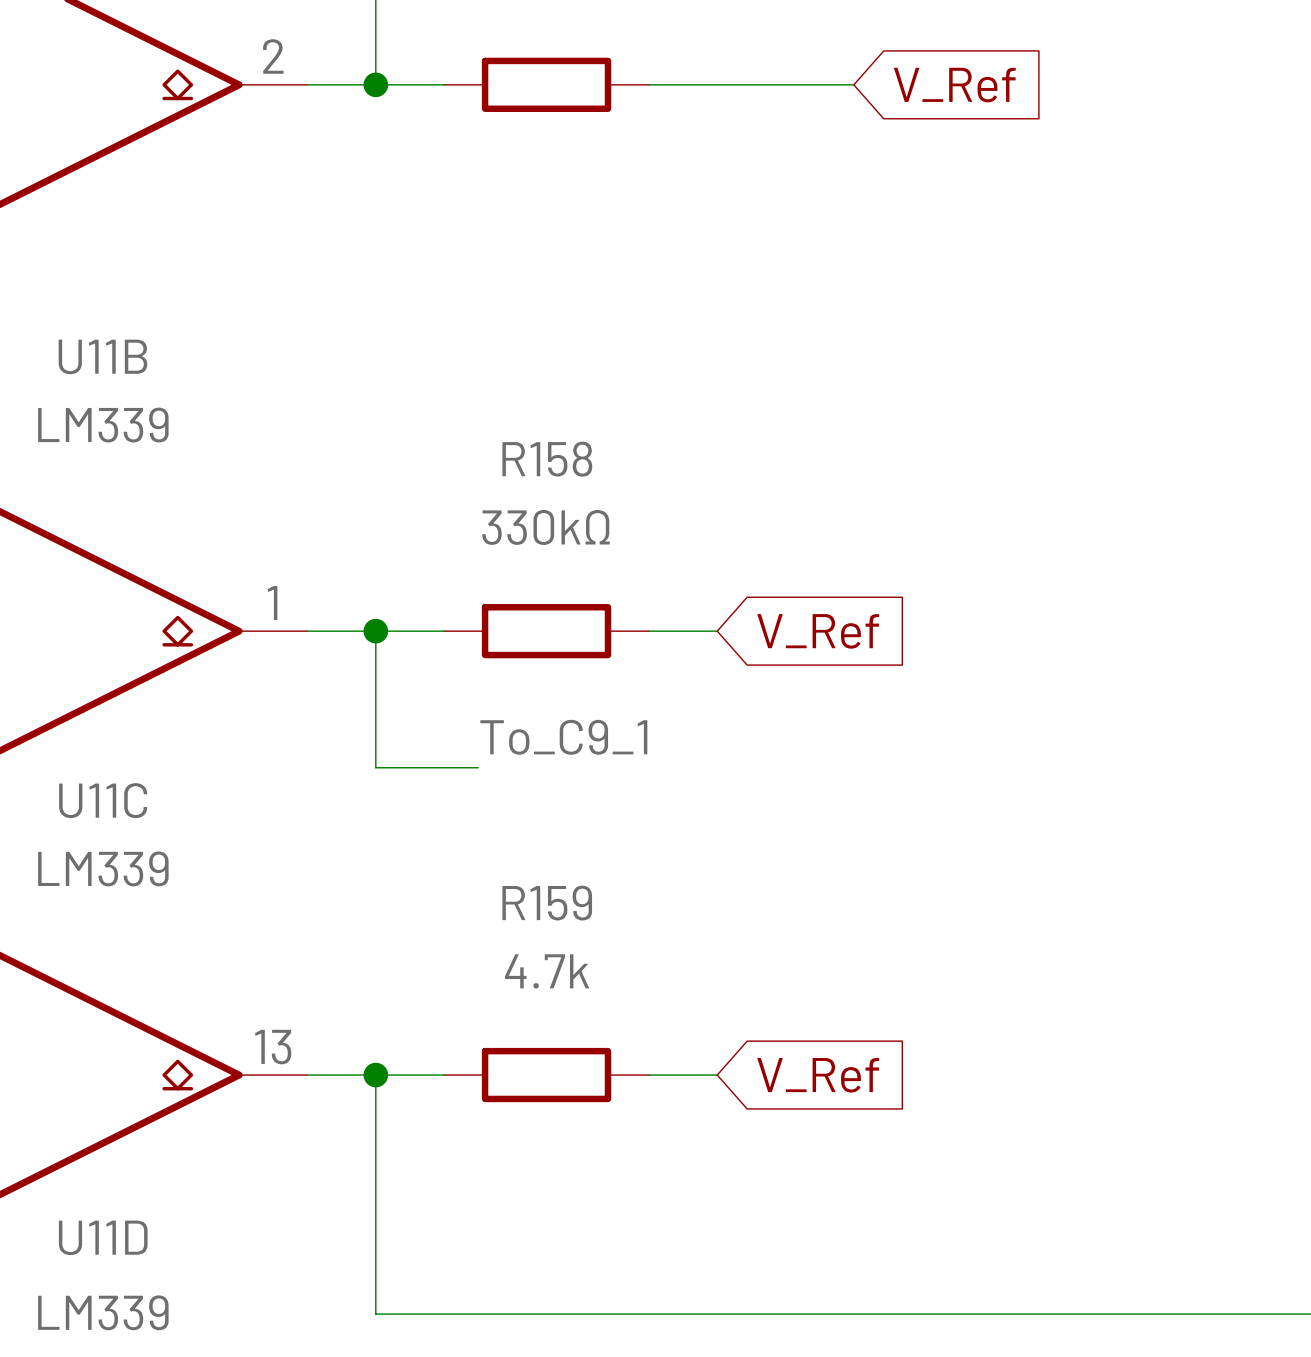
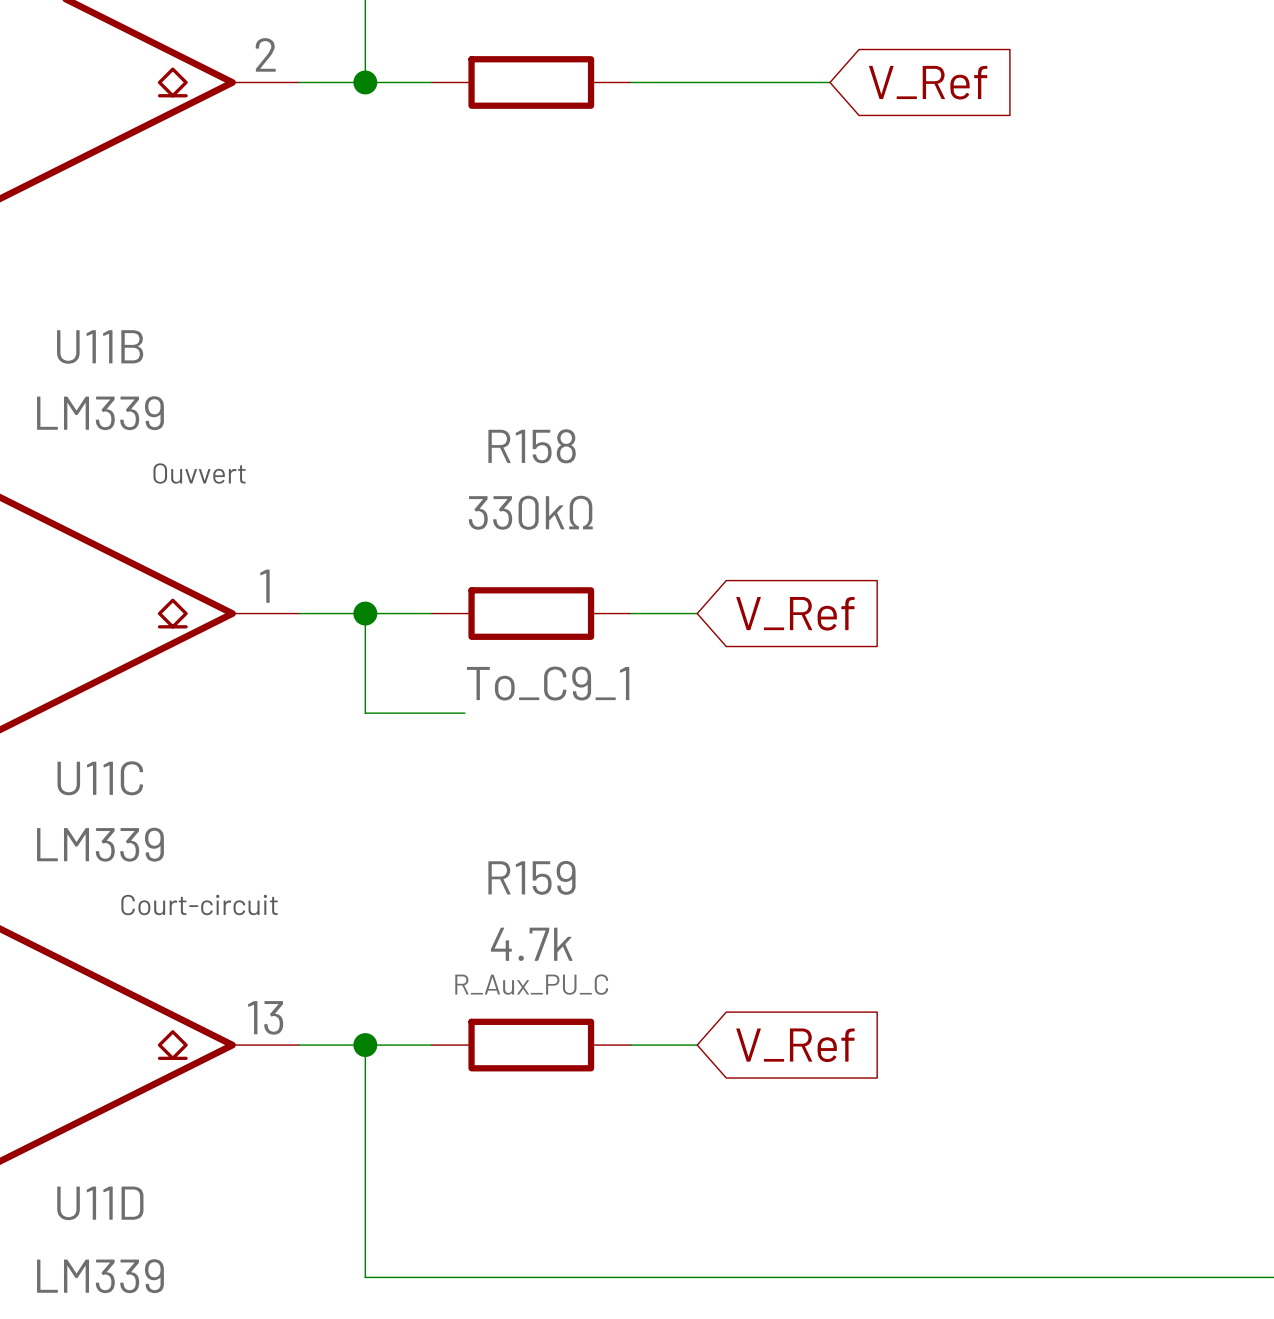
text: none -> Ouvvert (199, 473)
wire: (375, 733) (375, 767) (478, 767) -> (365, 713) (464, 713)
label position: To_C9_1 (563, 737) -> To_C9_1 (548, 683)
text: none -> Court-circuit (199, 905)
R159 text: none -> R_Aux_PU_C (531, 984)

